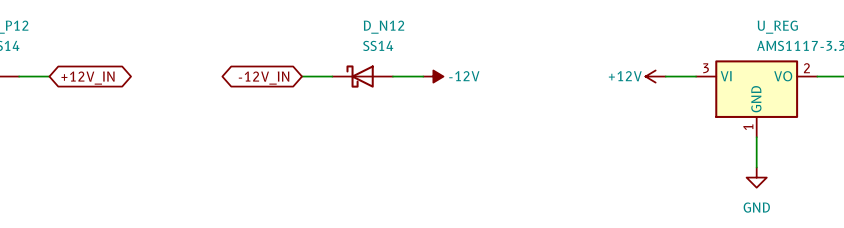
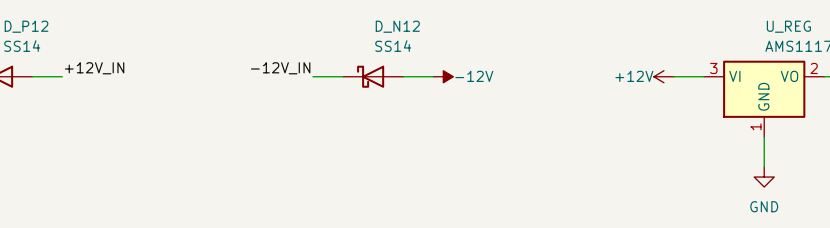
label: none -> +12V_IN (94, 68)
label: none -> -12V_IN (280, 68)
global label: +12V_IN (88, 78) -> none
global label: -12V_IN (264, 78) -> none

